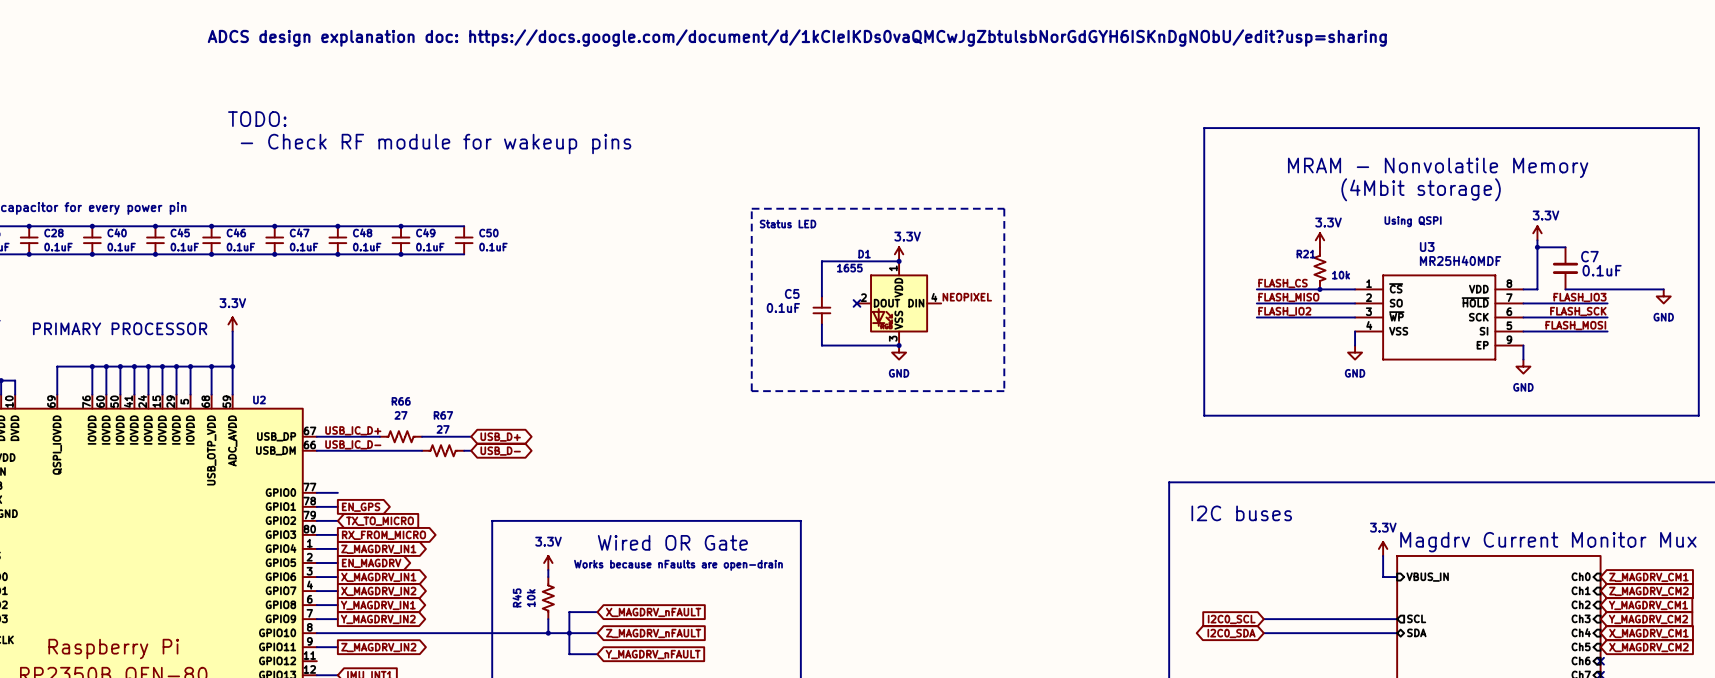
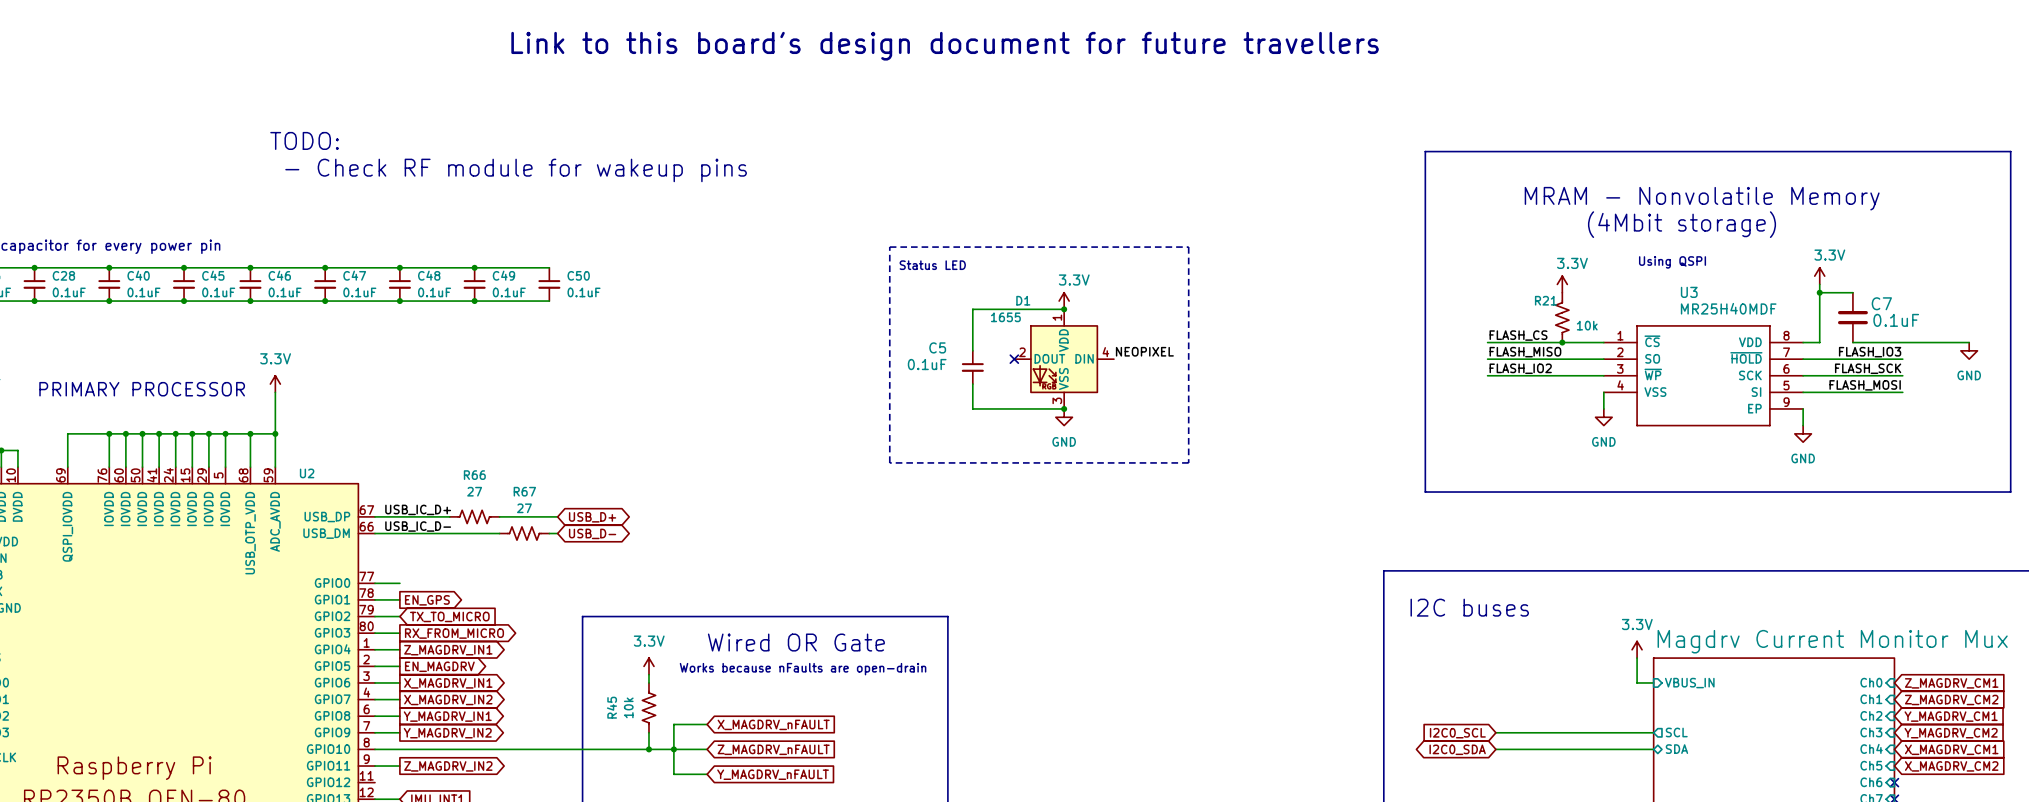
text: ADCS design explanation doc: https://docs.google.com/document/d/1kCIeIKDs0vaQMCwJgZbtulsbNorGdGYH6ISKnDgNObU/edit?usp=sharing (797, 38) -> Link to this board's design document for future travellers (945, 46)

